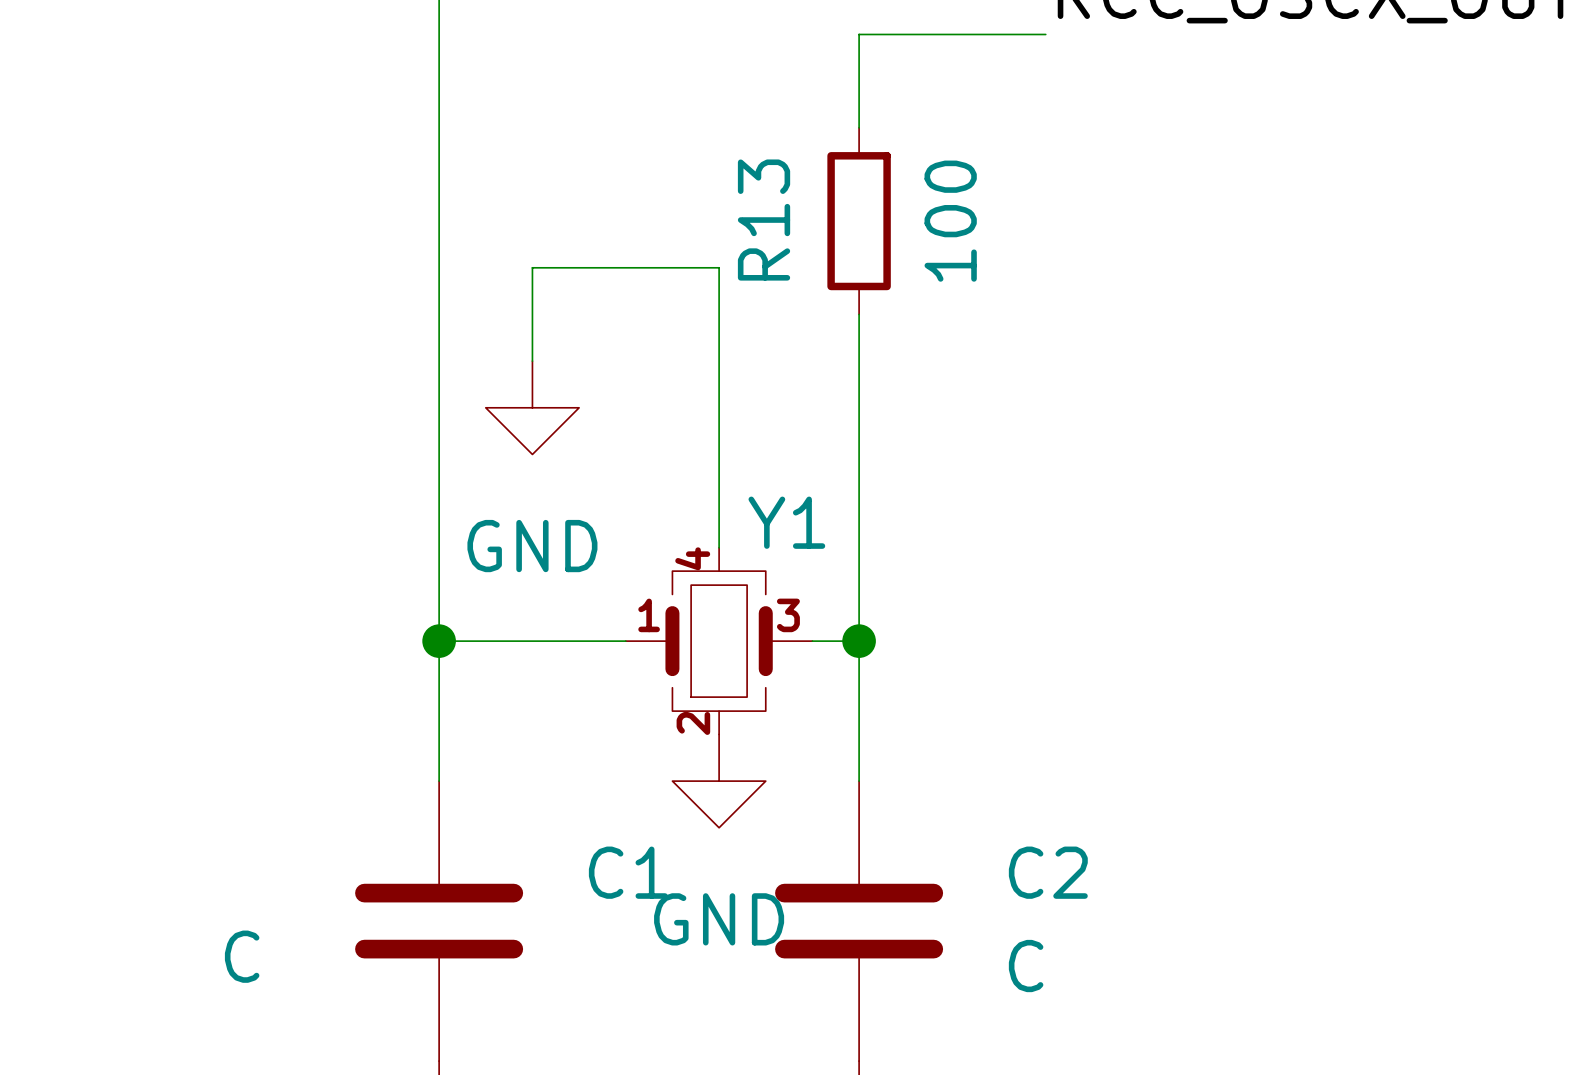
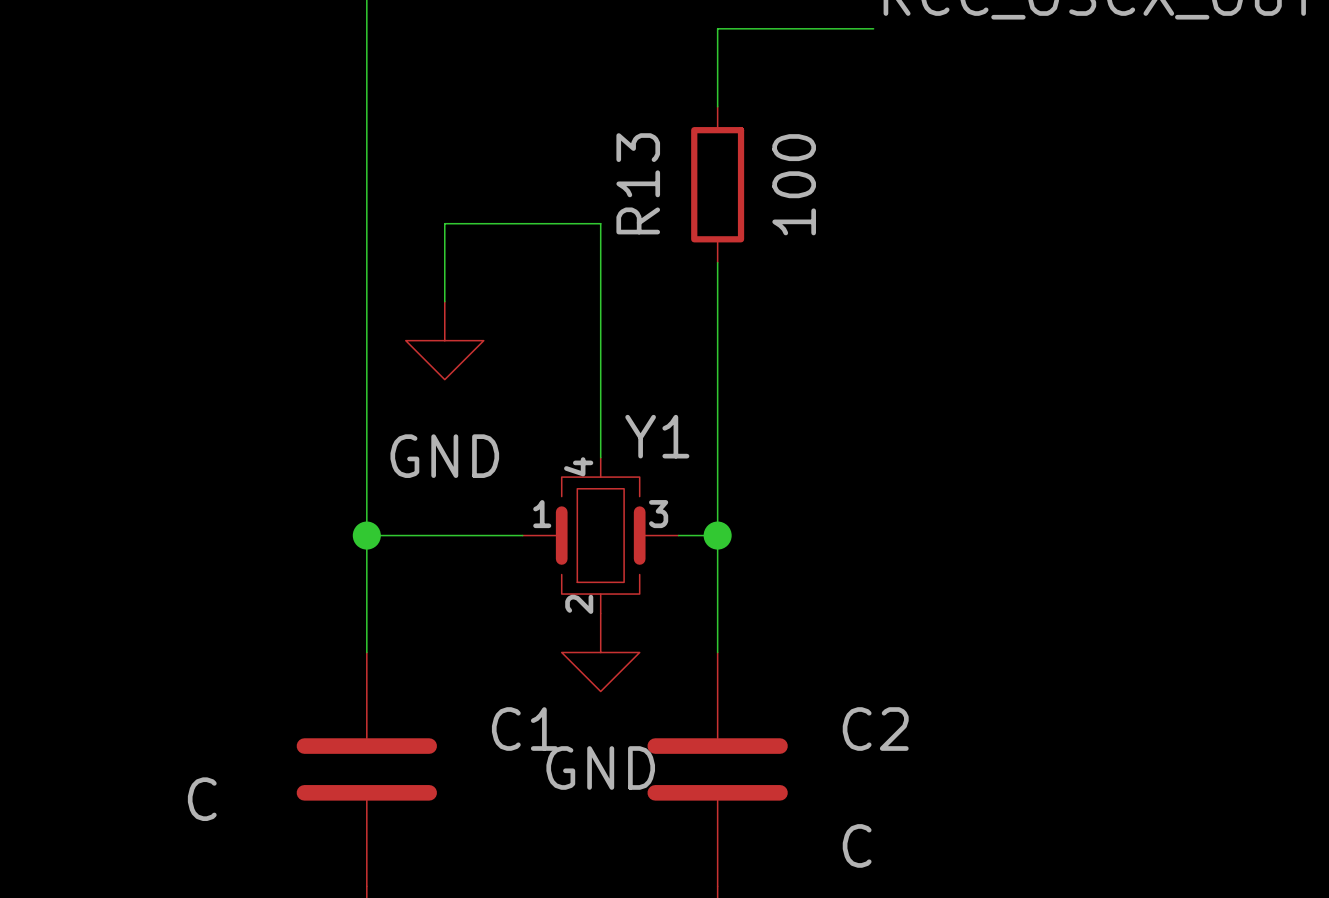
C2 value position: C (1026, 966) -> C (857, 845)

